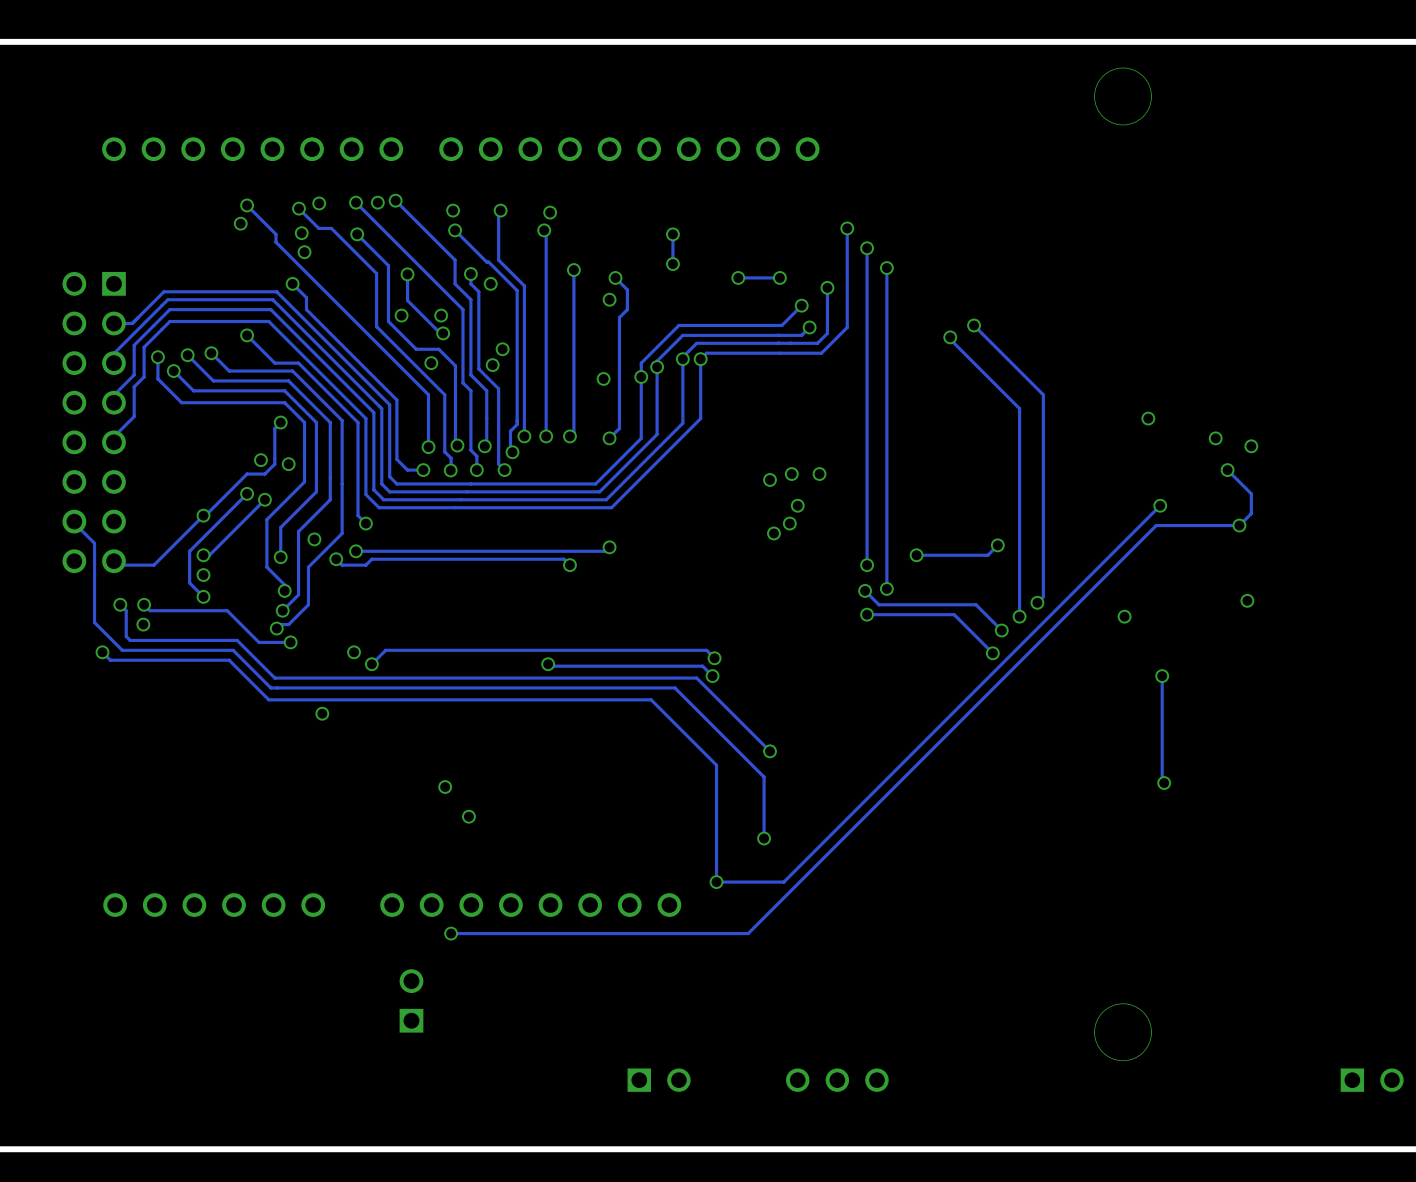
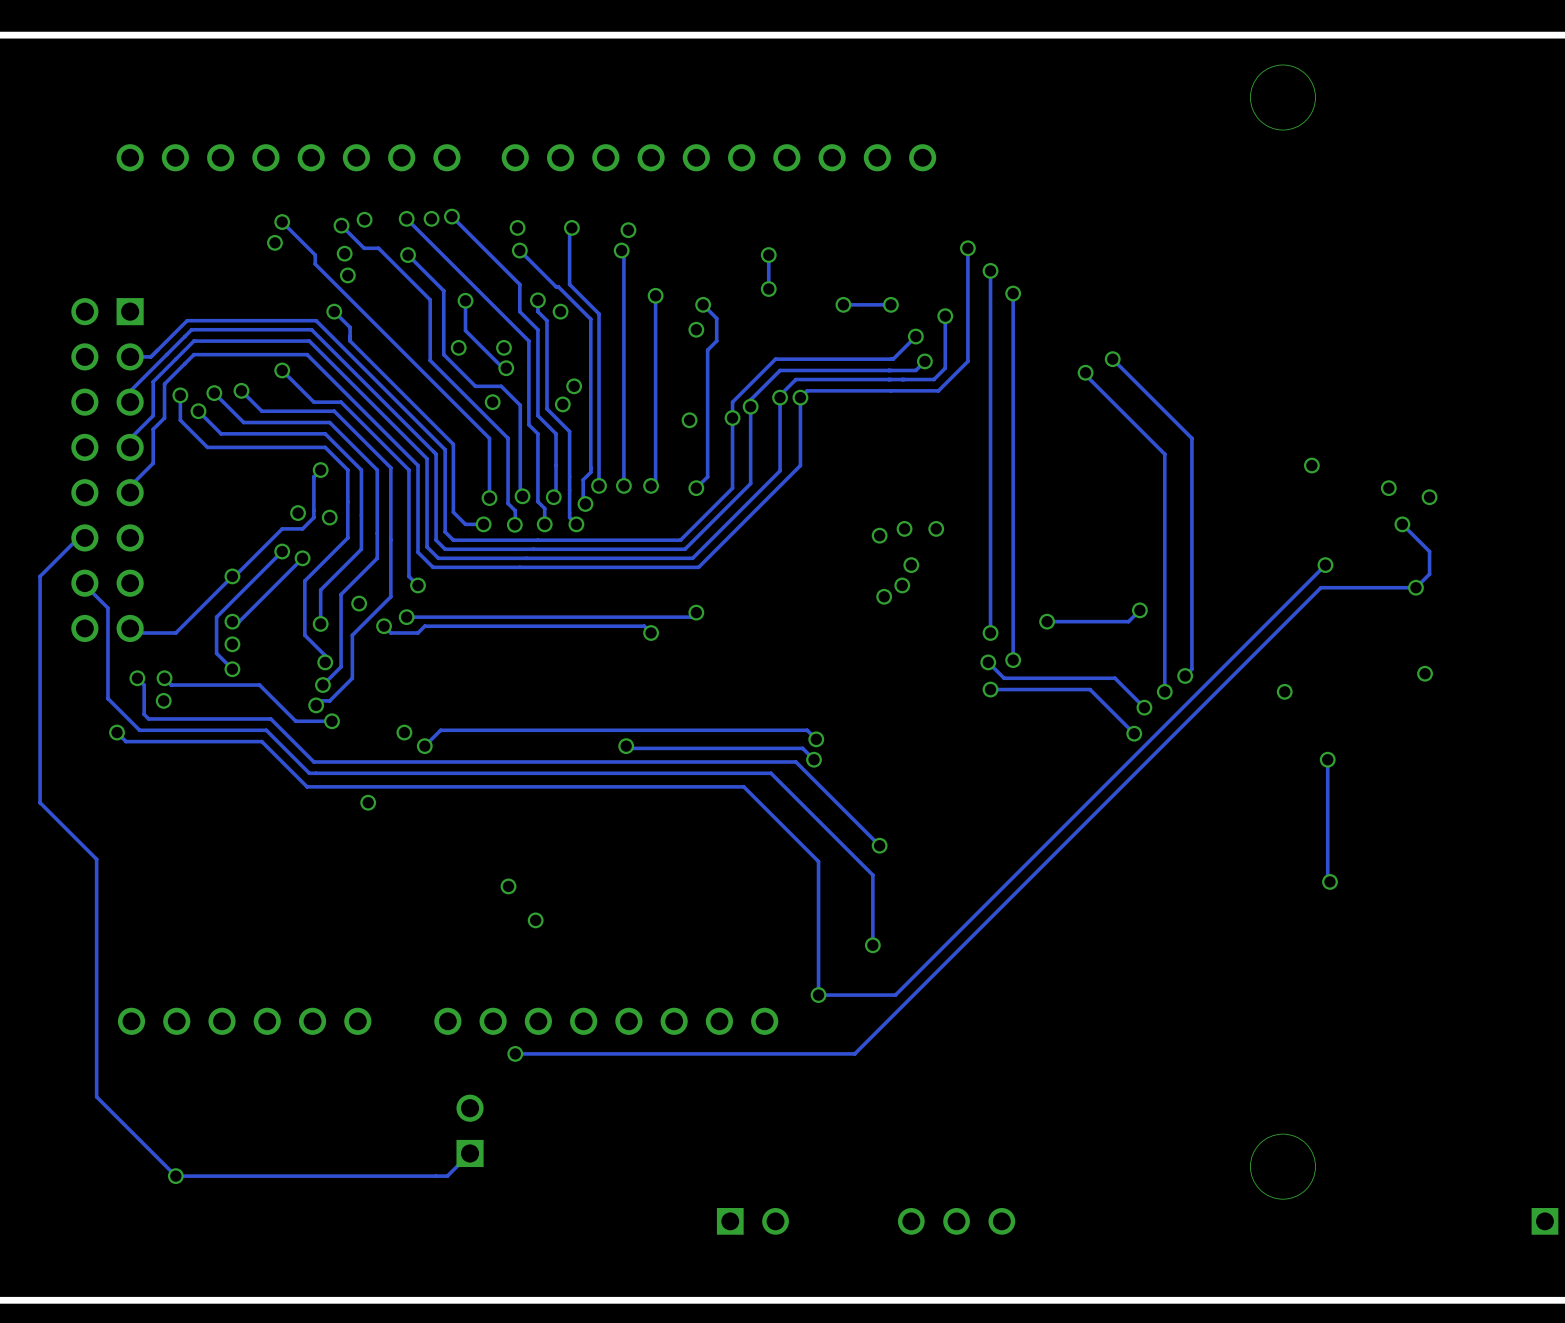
track: none -> (84, 537) (78, 537) (40, 576) (40, 802) (96, 859) (96, 1096) (175, 1176) (447, 1176) (470, 1153)
via: none -> (175, 1176)

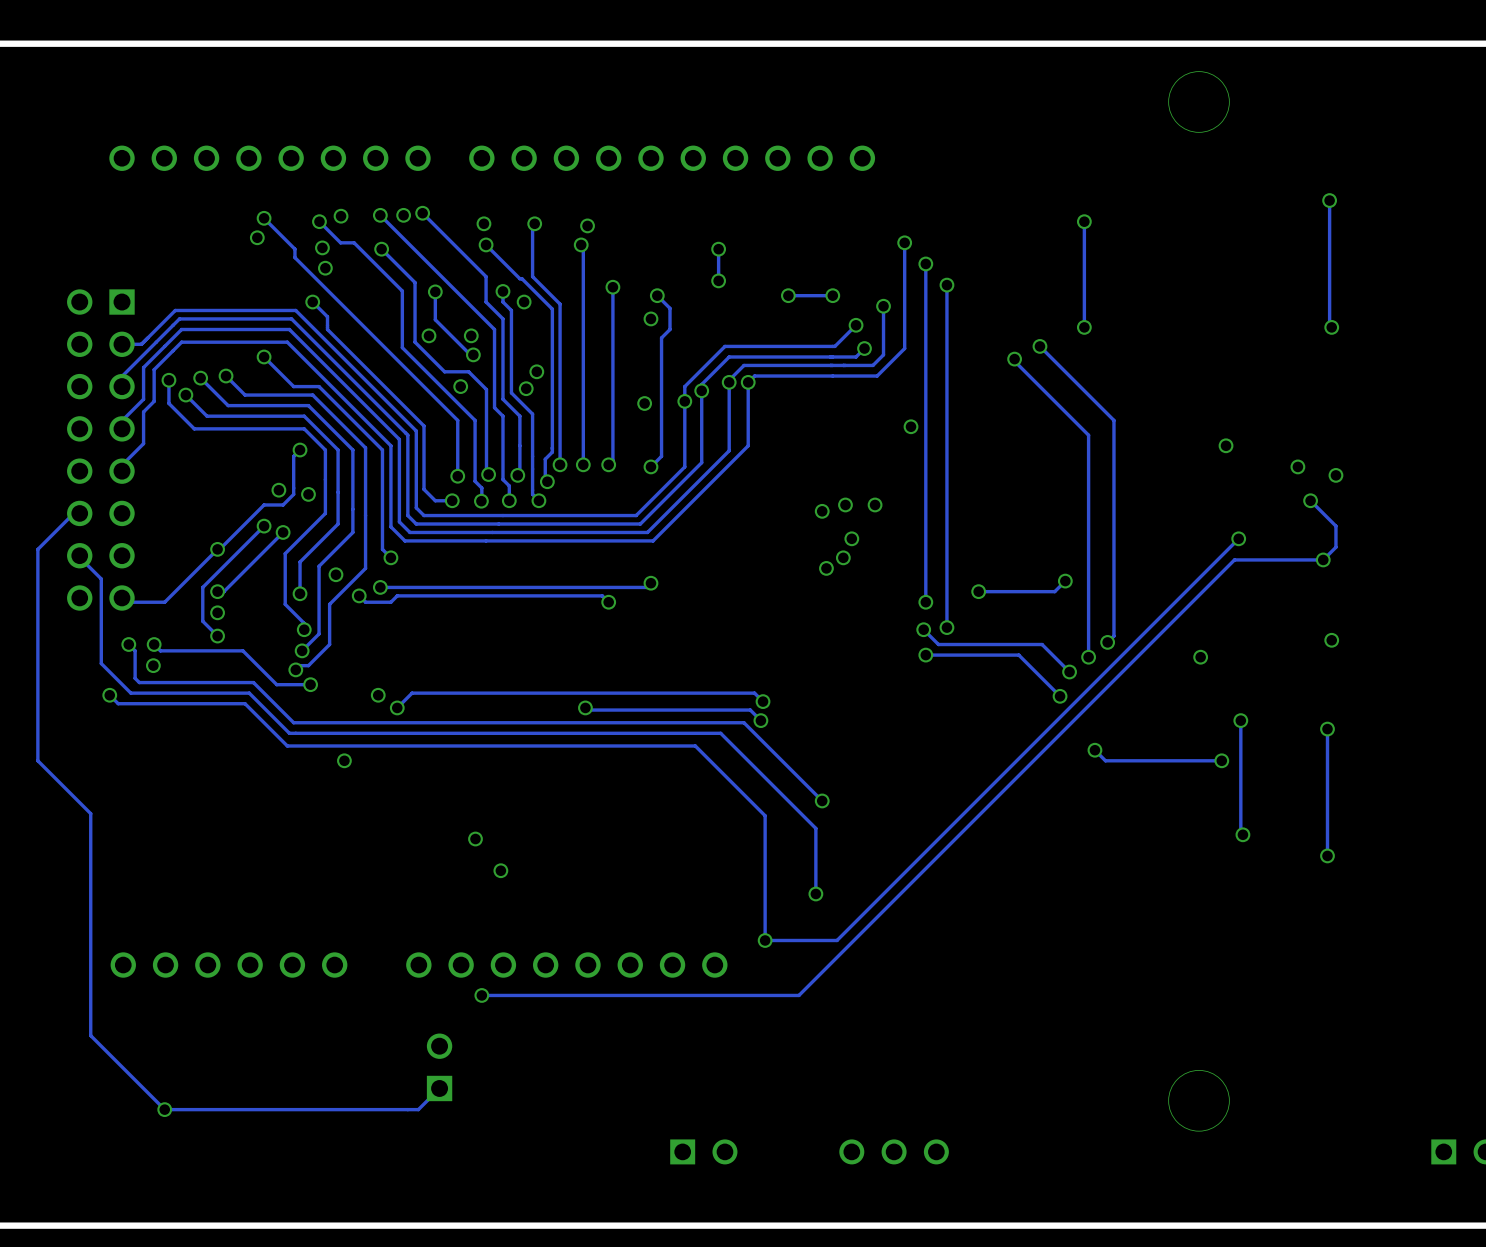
track: none -> (1329, 200) (1329, 325) (1331, 327)
via: none -> (1329, 200)
track: none -> (1084, 221) (1084, 327)
via: none -> (1084, 221)
via: none -> (1084, 327)
via: none -> (1331, 327)
via: none -> (911, 426)
track: none -> (1327, 729) (1327, 855)
via: none -> (1327, 729)
track: none -> (1094, 750) (1105, 760) (1221, 760)
via: none -> (1094, 750)
via: none -> (1221, 760)
via: none -> (1327, 855)

